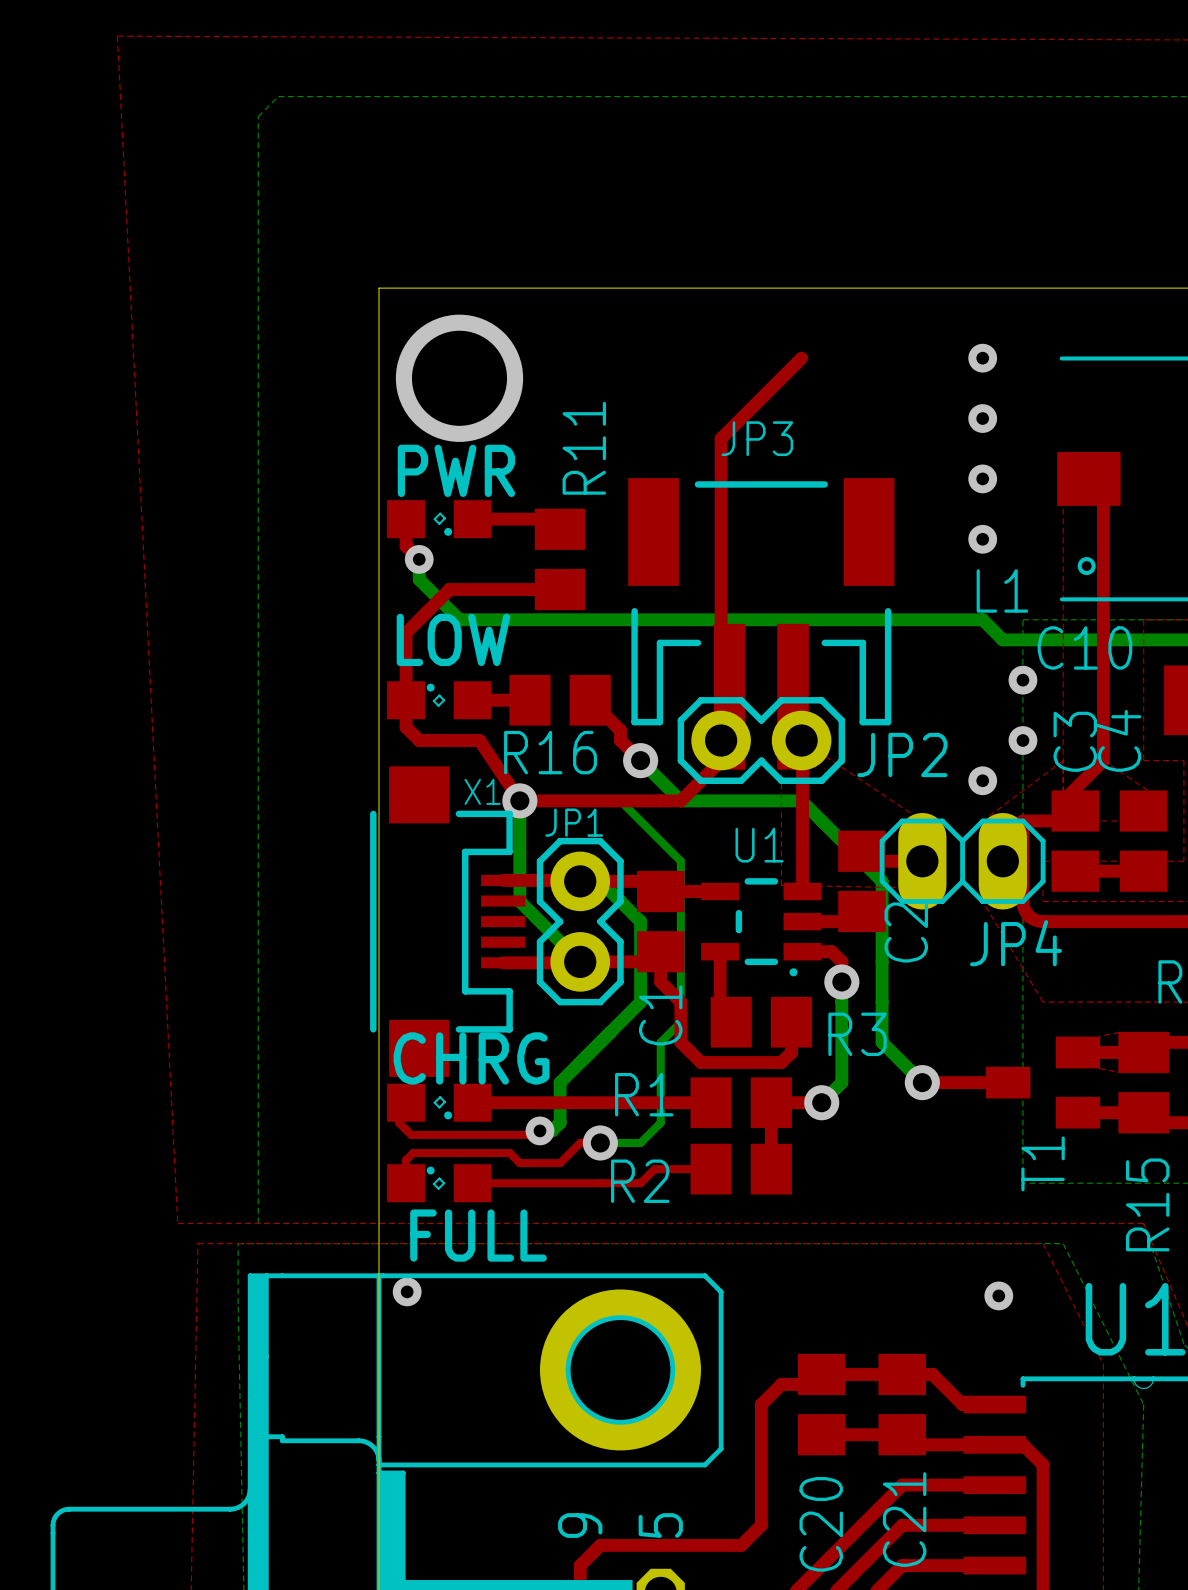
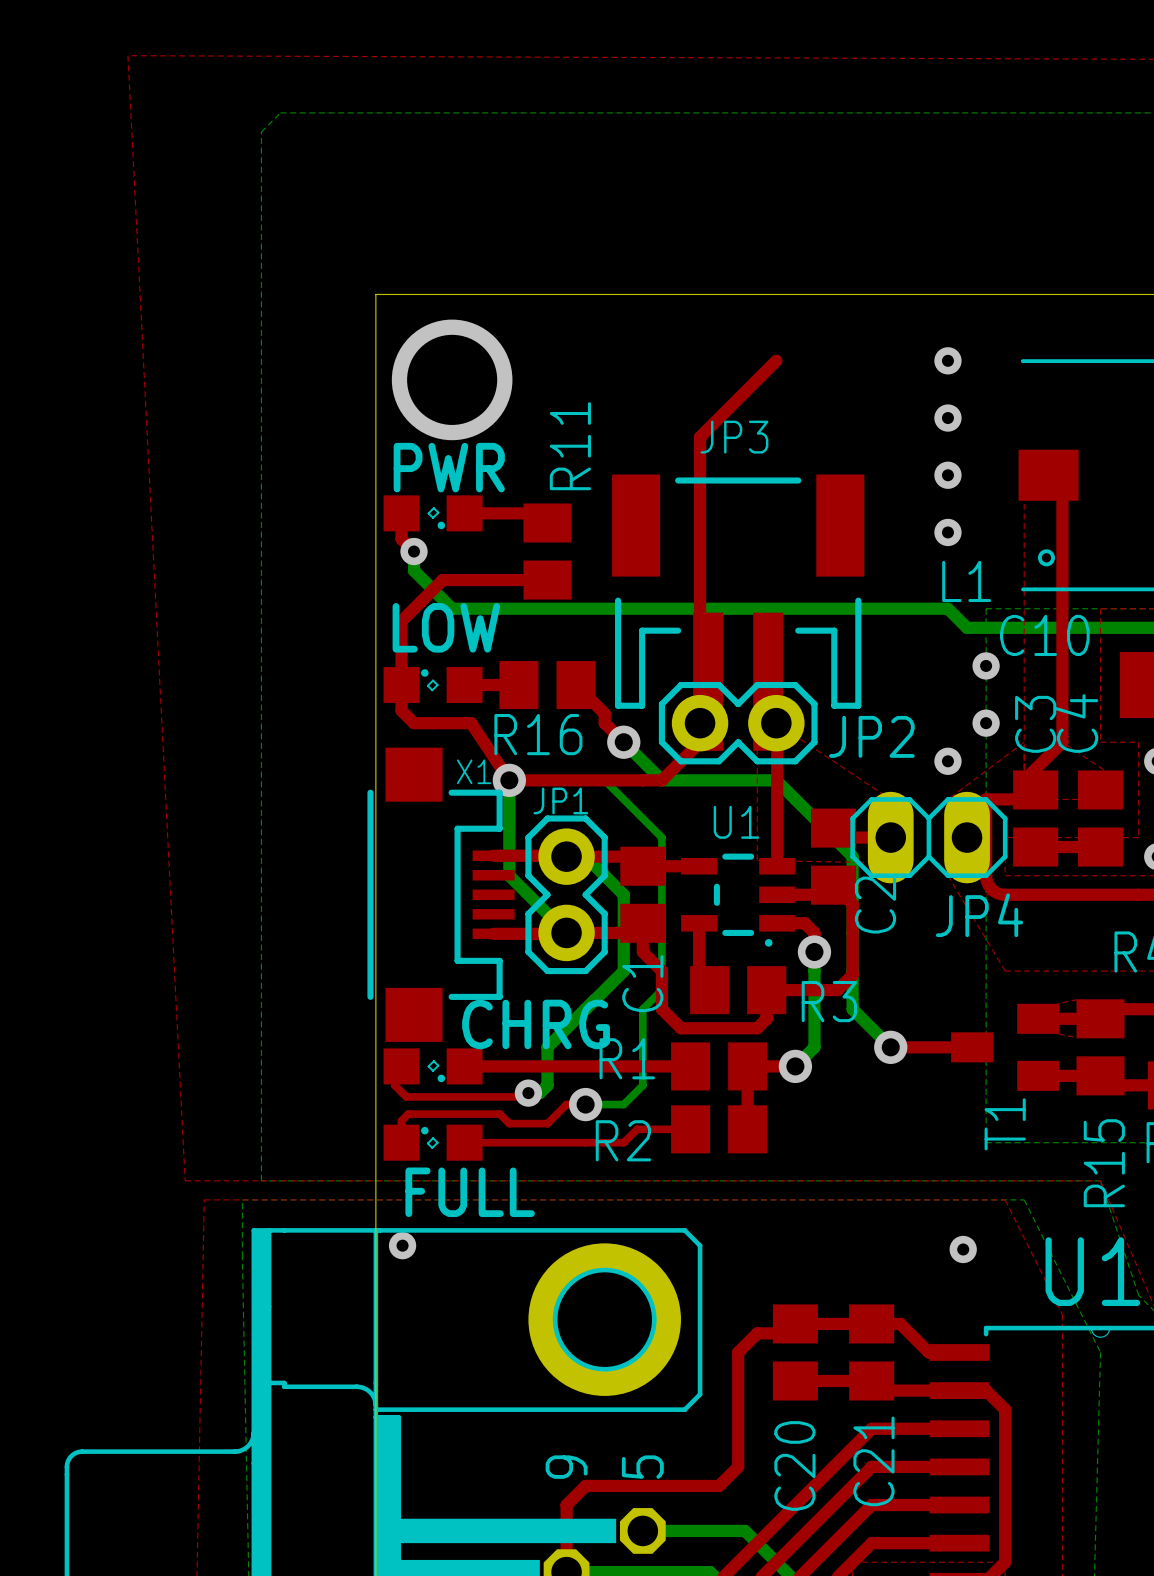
top track: none -> (833, 885) (852, 904) (852, 974) (837, 990) (766, 990)
text position: CHRG (471, 1058) -> CHRG (536, 1024)

